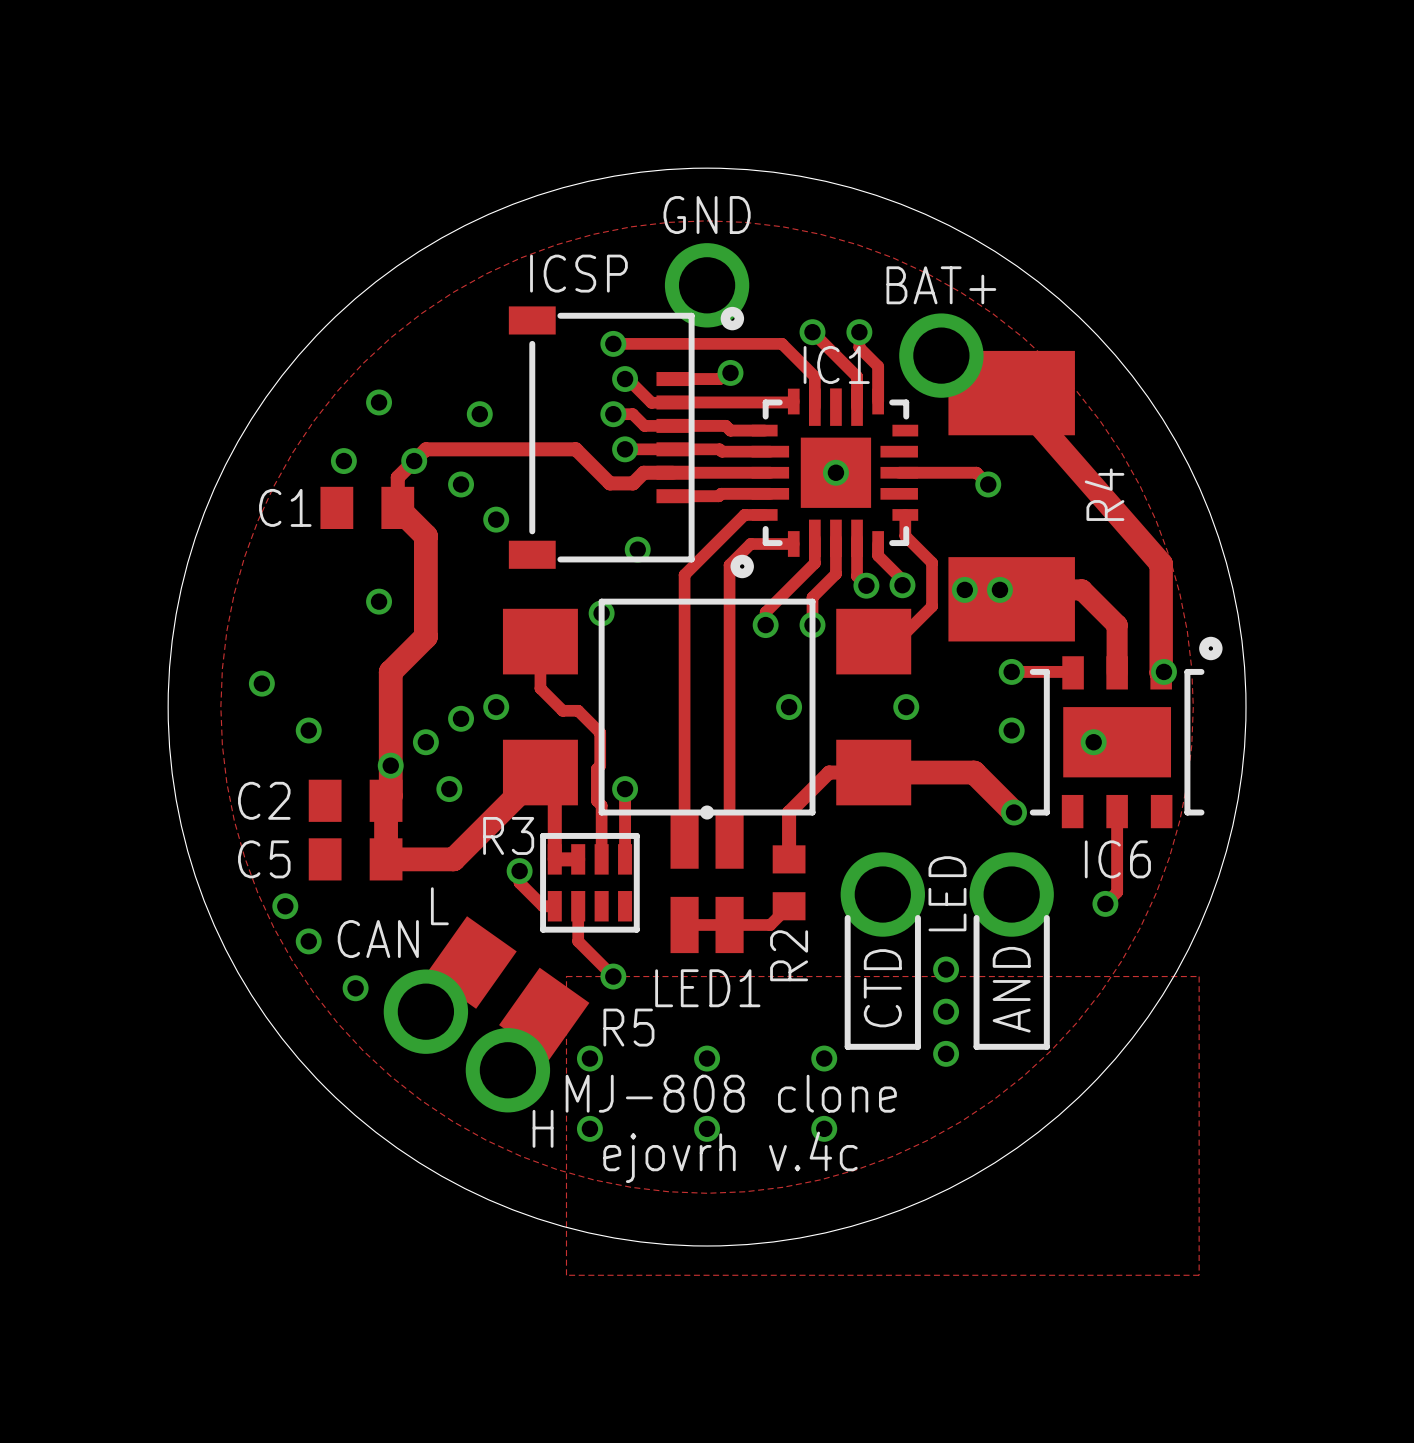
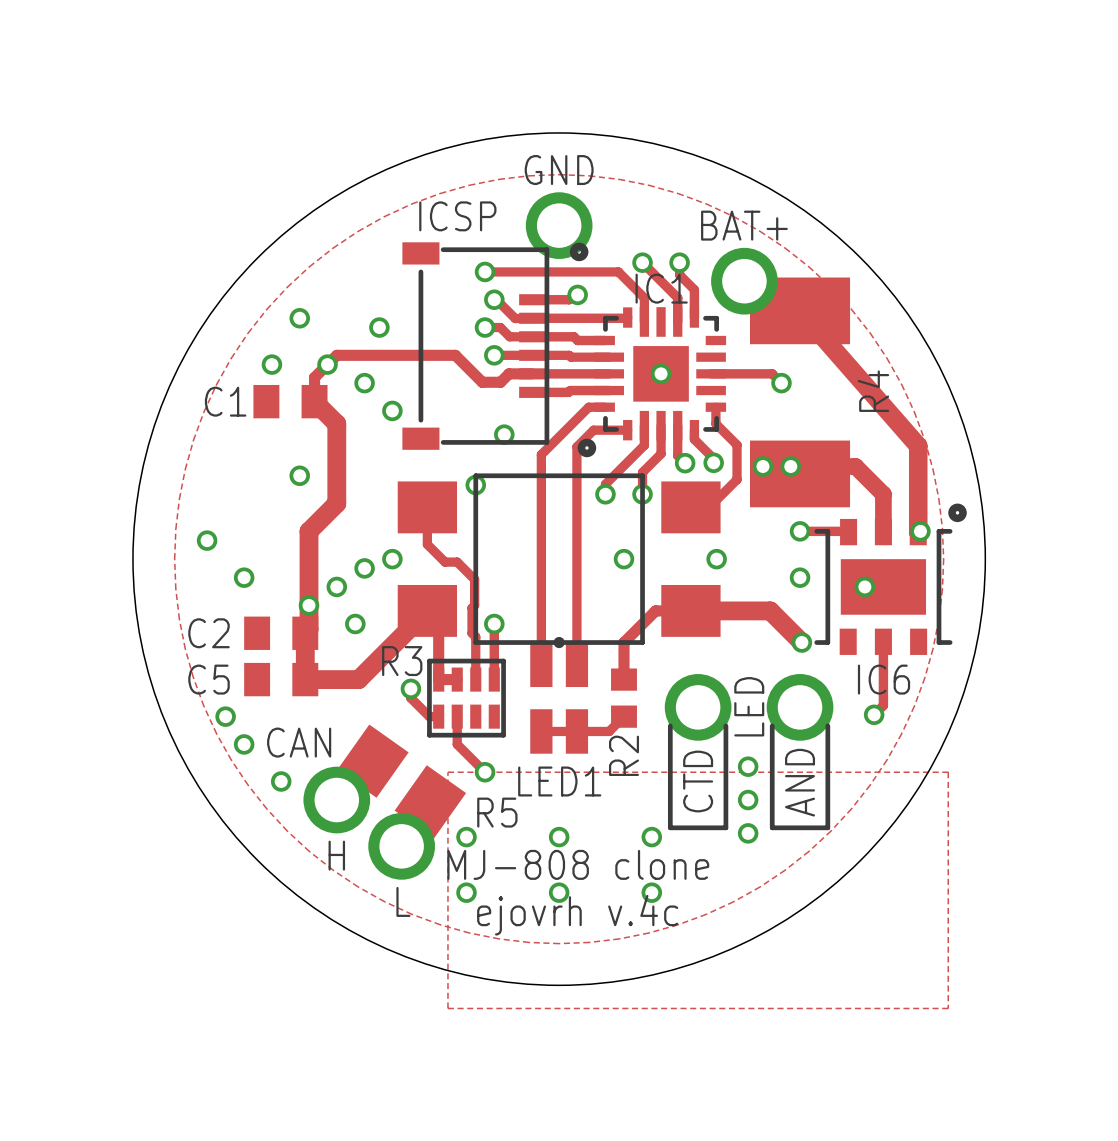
text position: L (439, 906) -> L (403, 901)
text position: H (543, 1128) -> H (336, 855)

